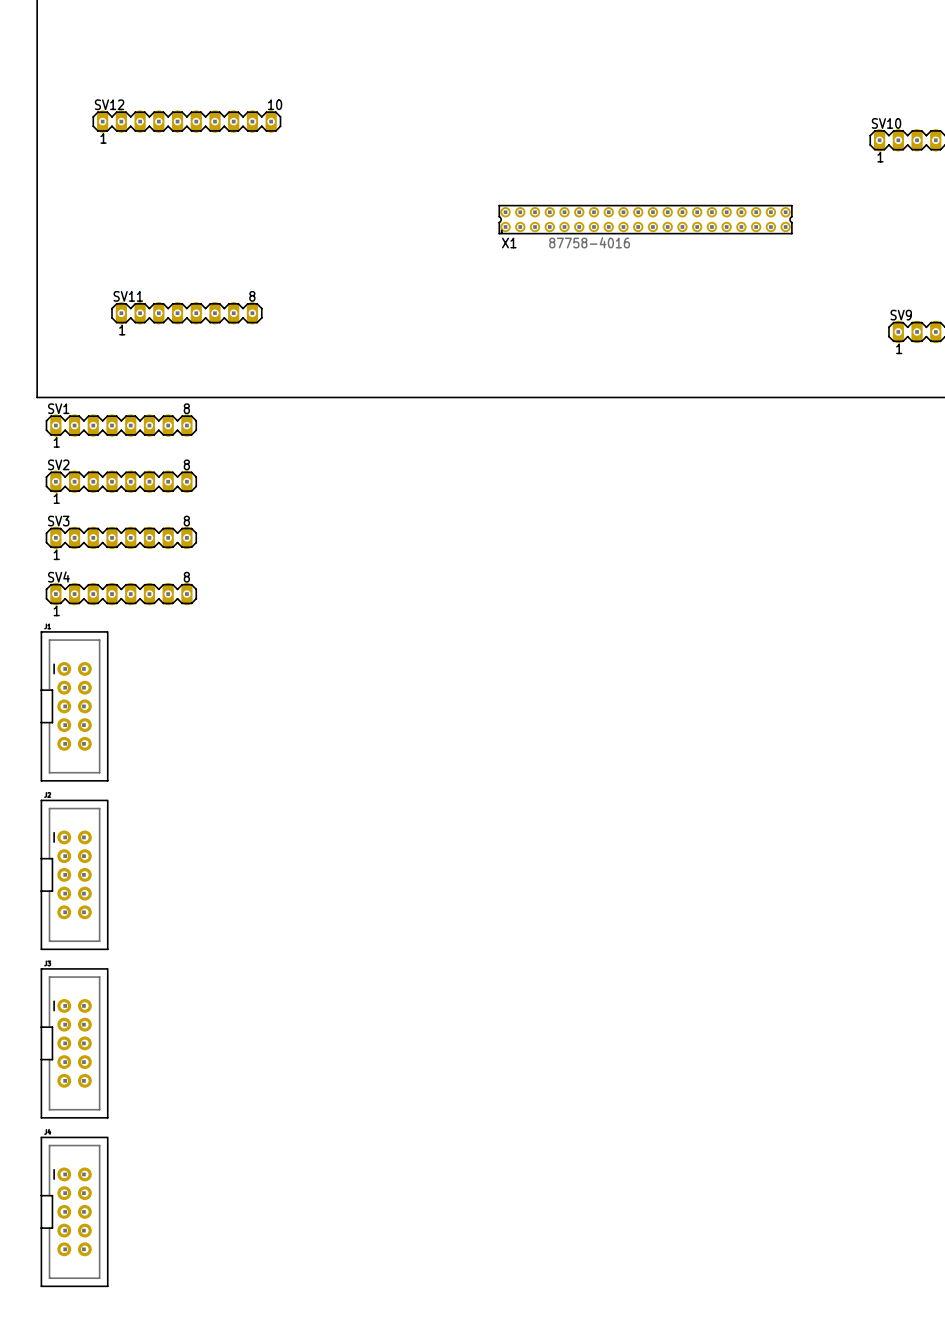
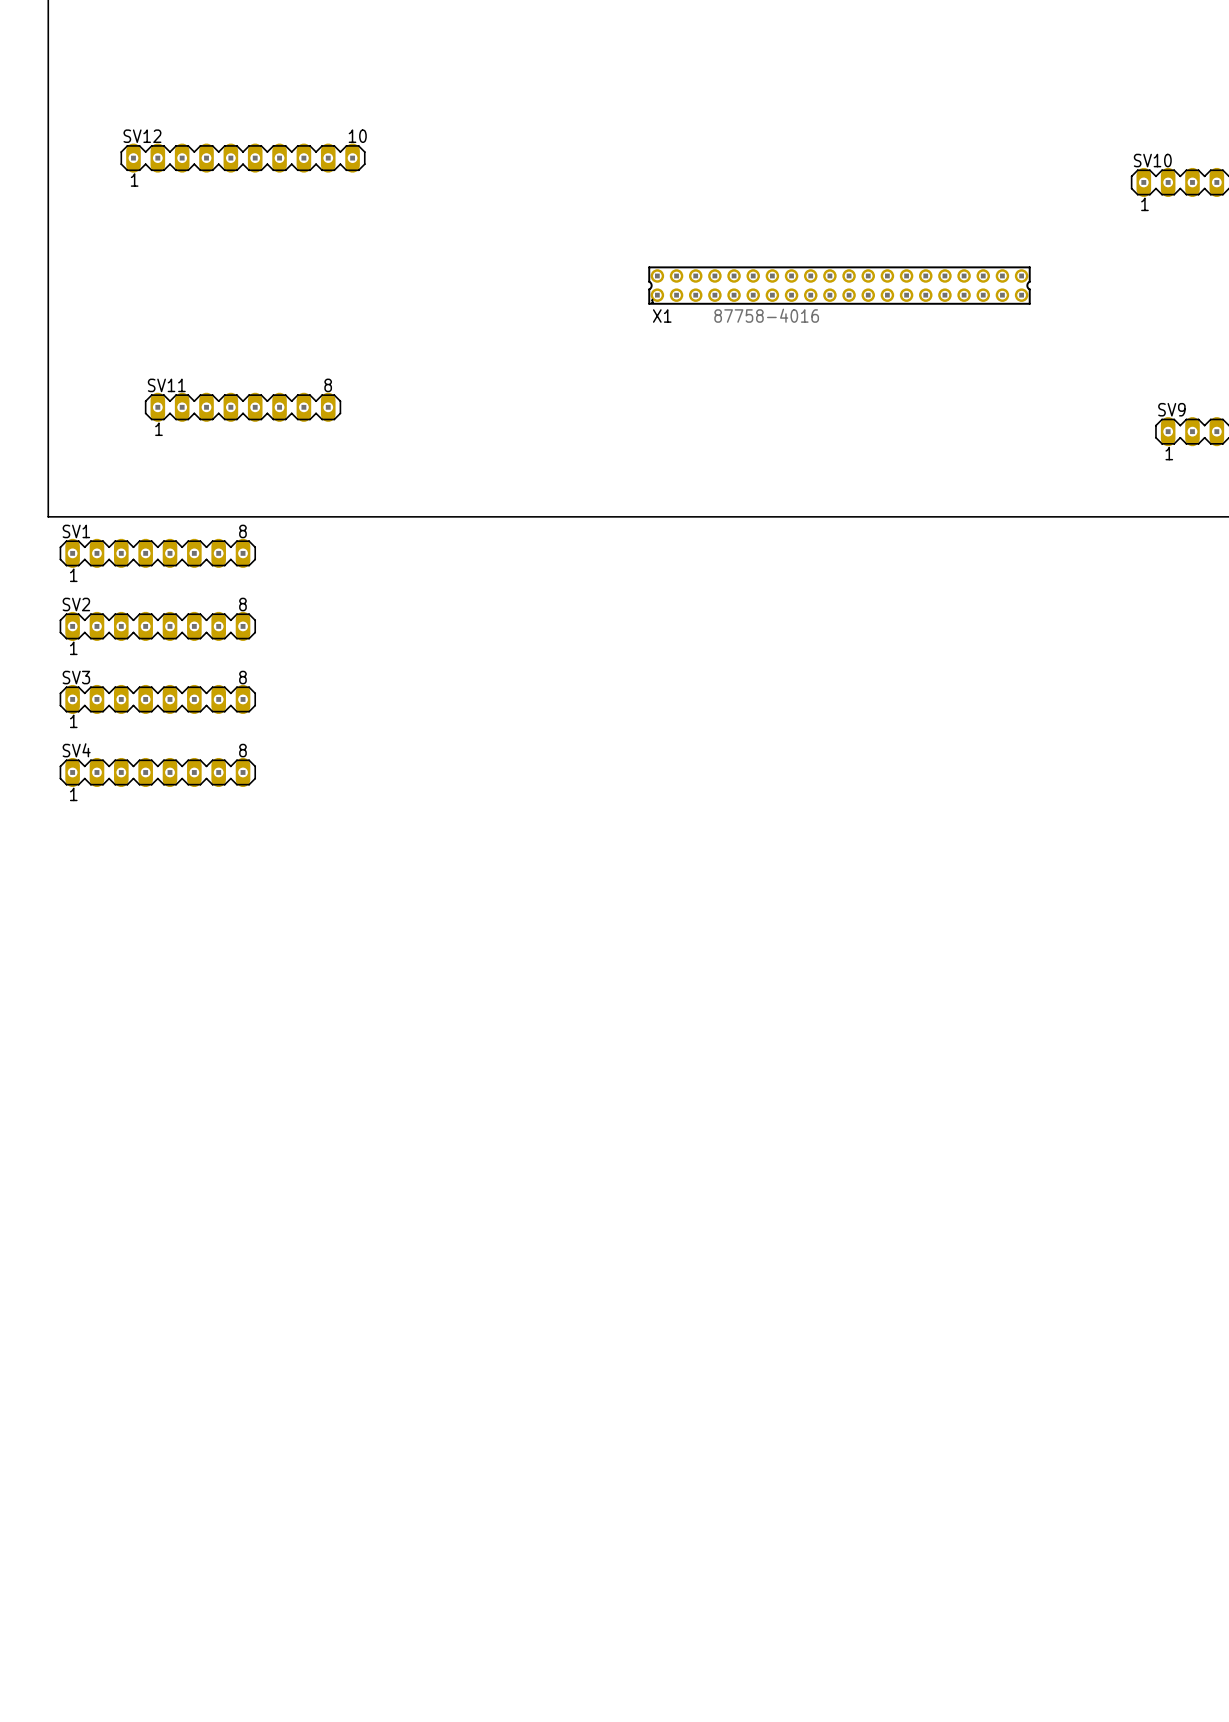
part: (74, 706) -> none
part: (74, 874) -> none
part: (74, 1043) -> none
part: (74, 1211) -> none

